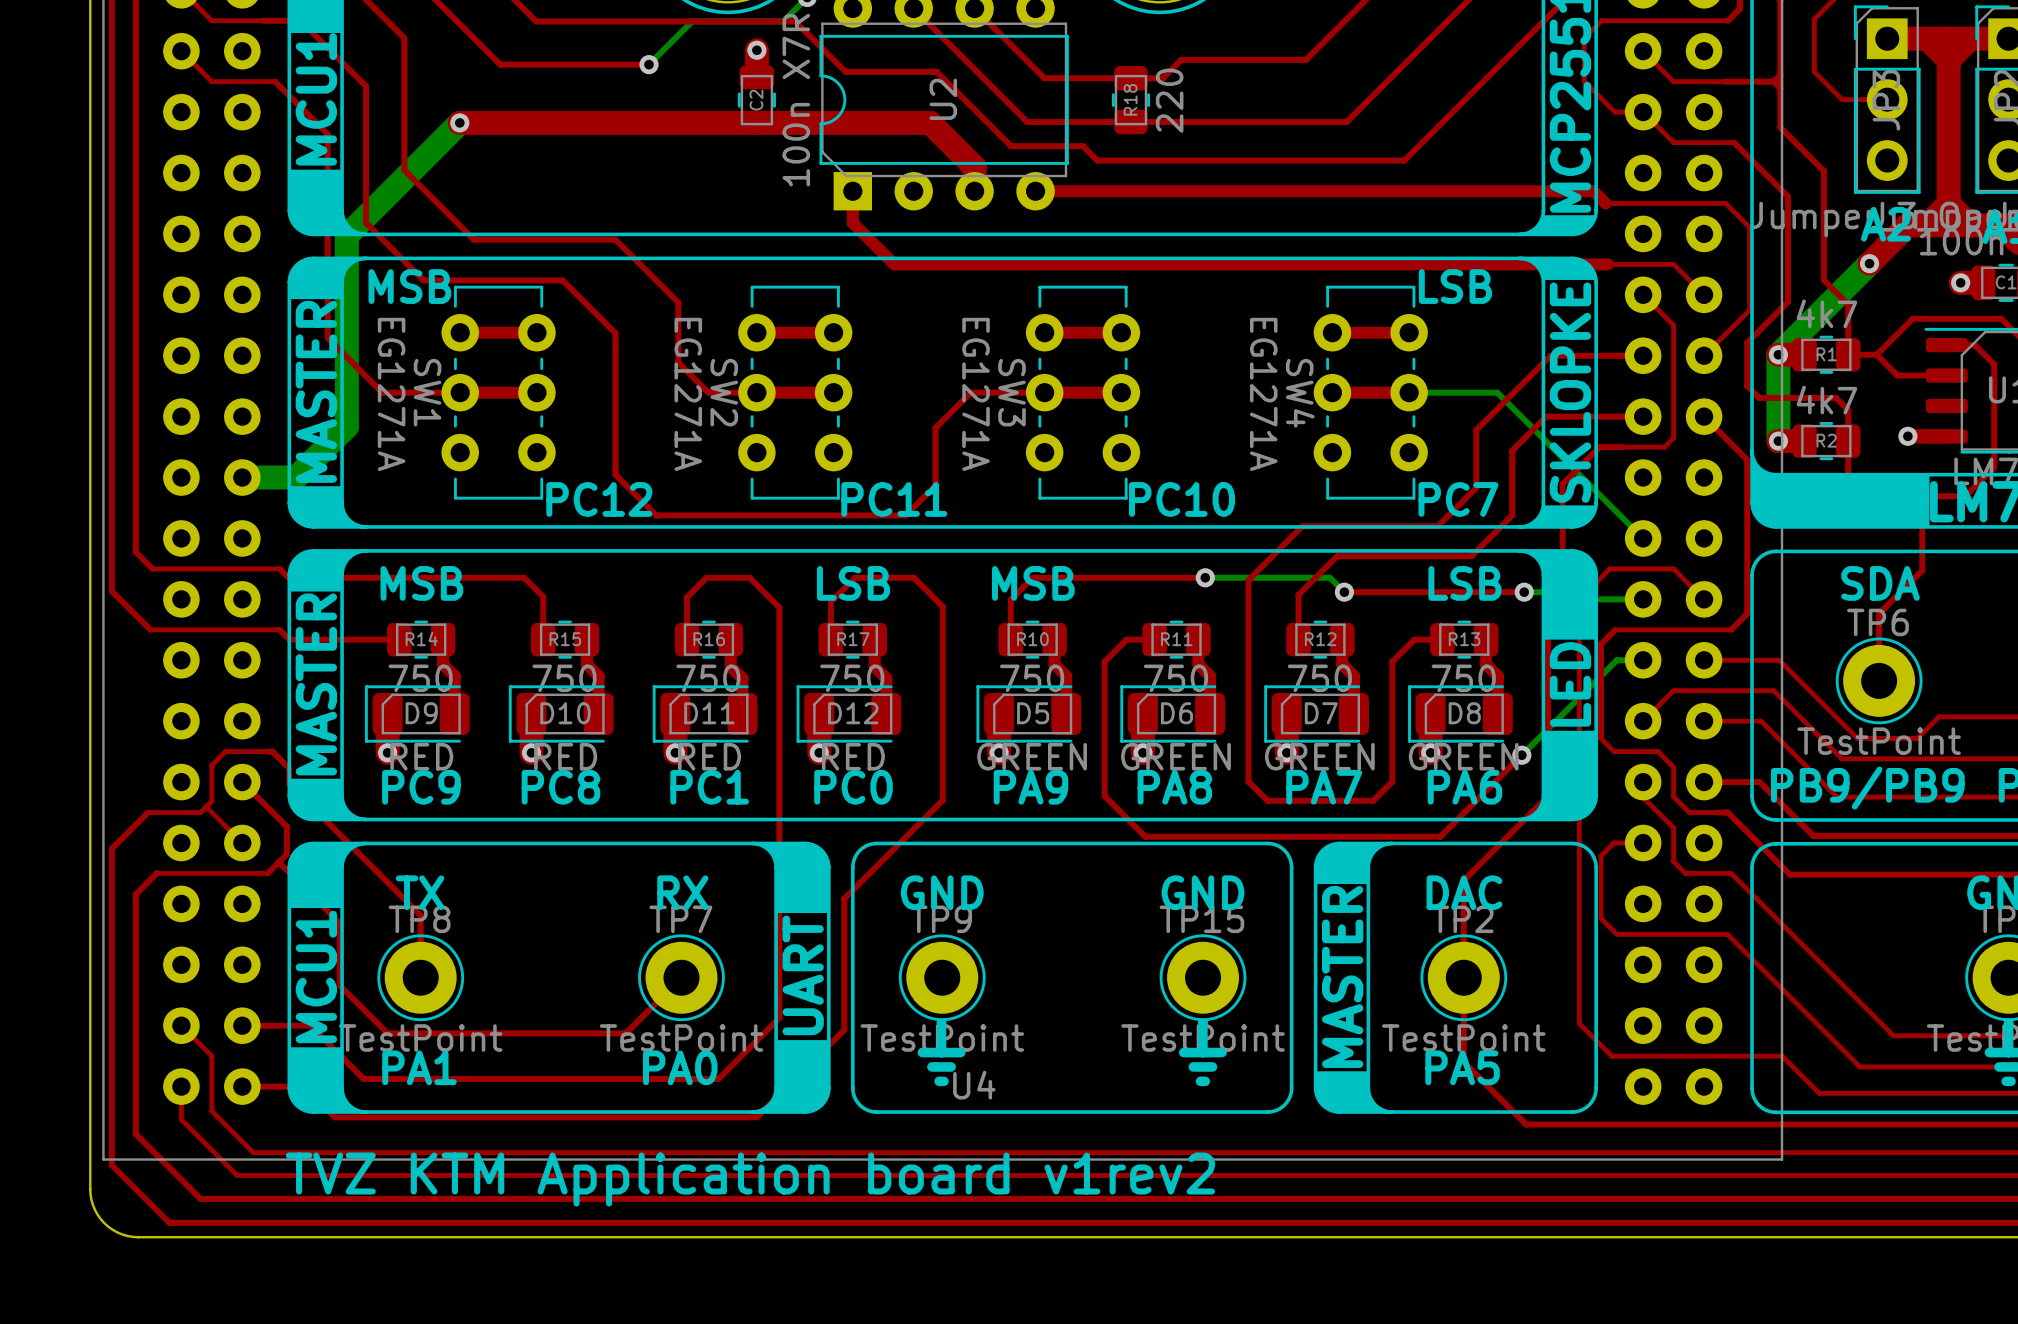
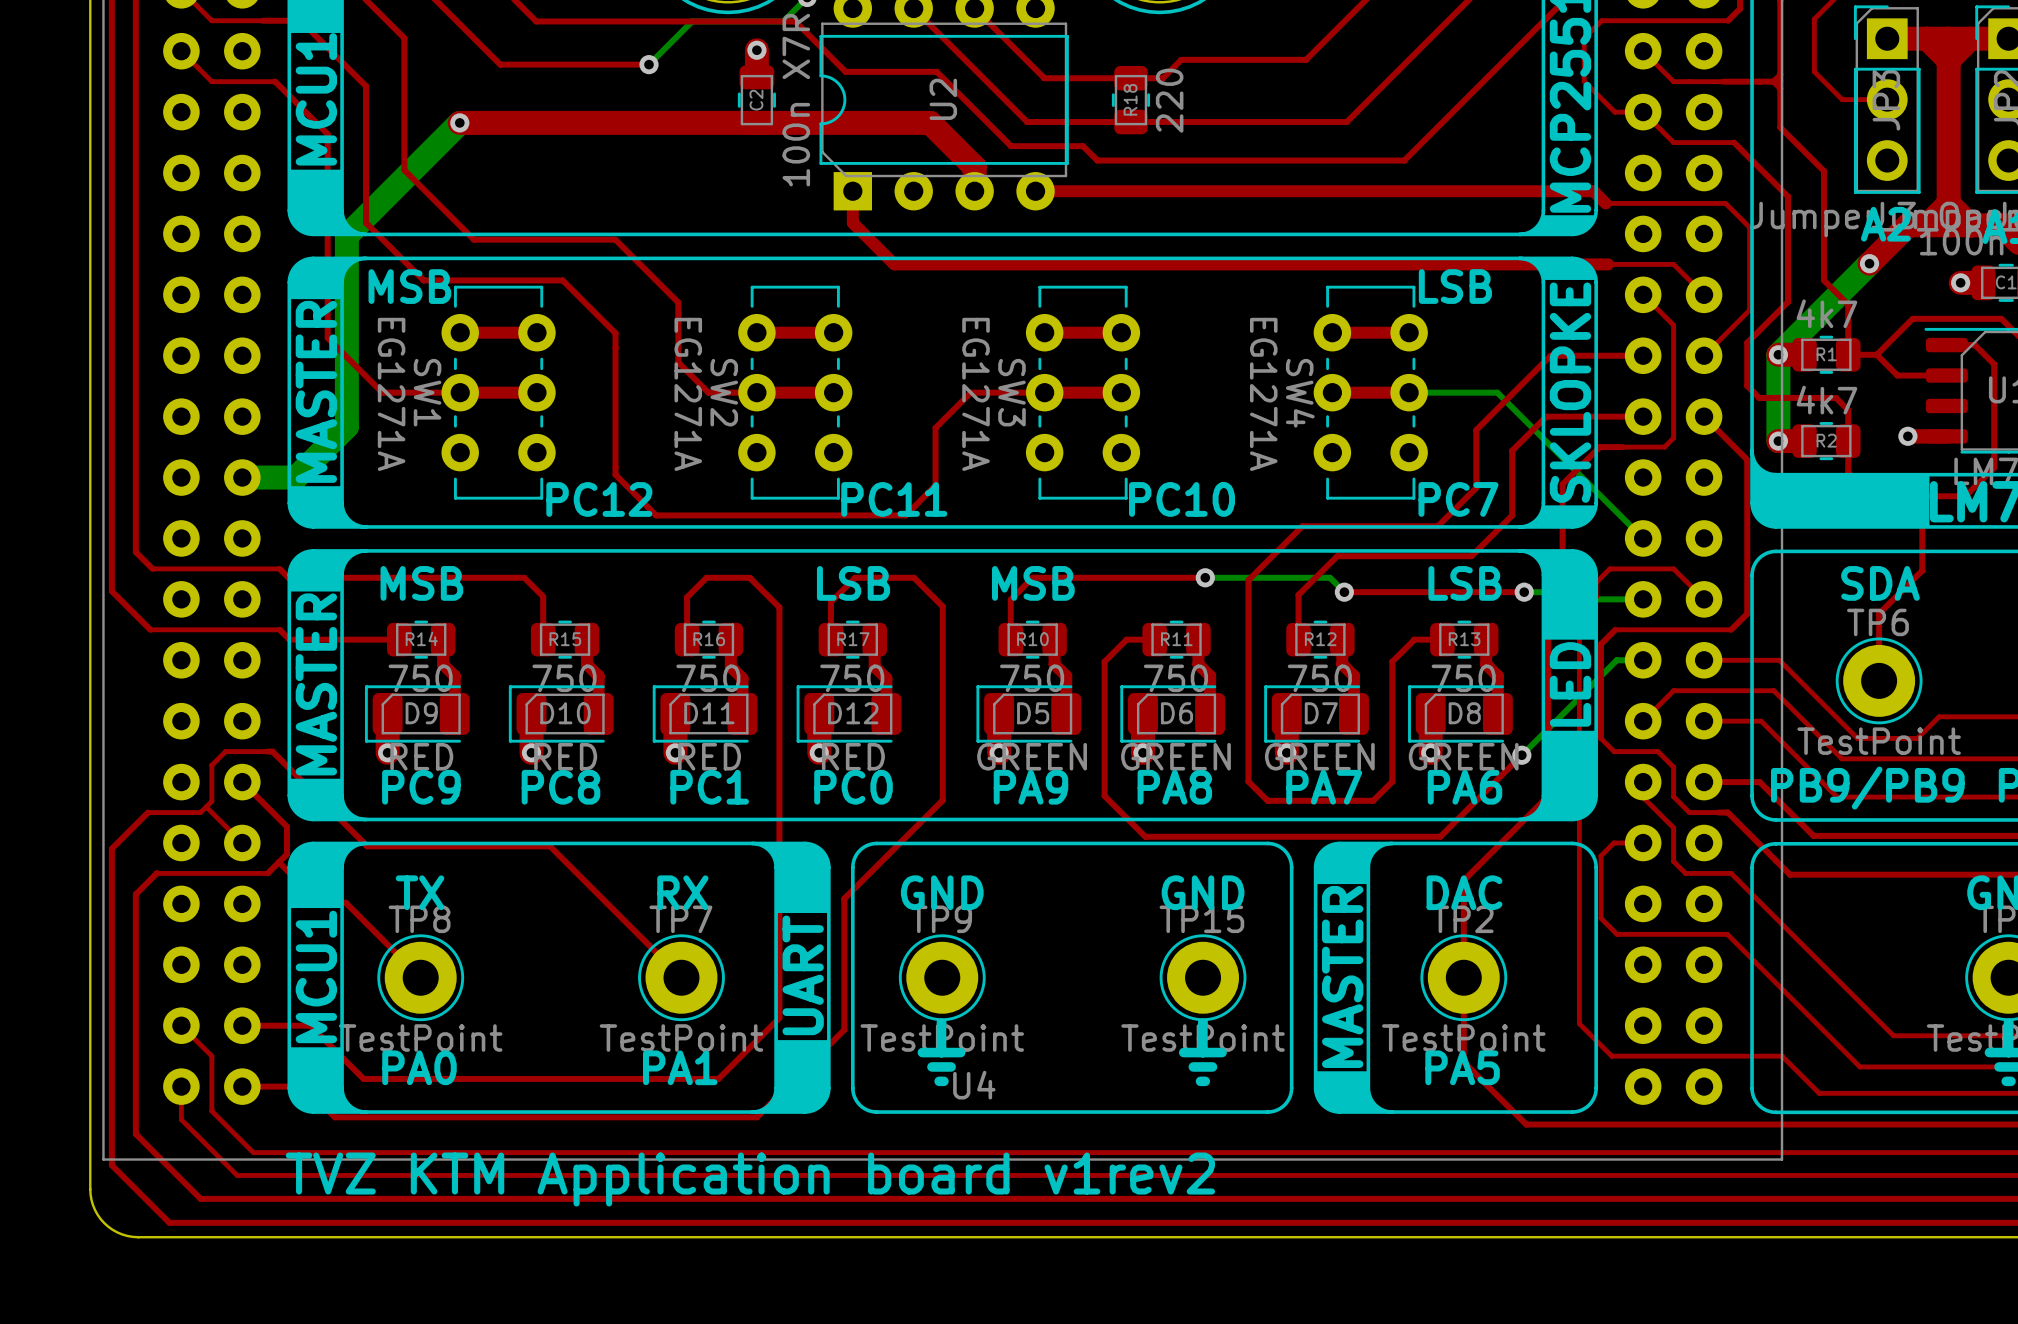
top track: (289, 768) (289, 784) (420, 915) (420, 977) -> (319, 902) (345, 902) (420, 977)
top track: (319, 902) (339, 923) (339, 985) (387, 1033) (625, 1033) (681, 977) -> (289, 768) (367, 846) (550, 846) (681, 977)
text: PA1 (419, 1067) -> PA0 (419, 1067)
text: PA0 (680, 1067) -> PA1 (680, 1067)

